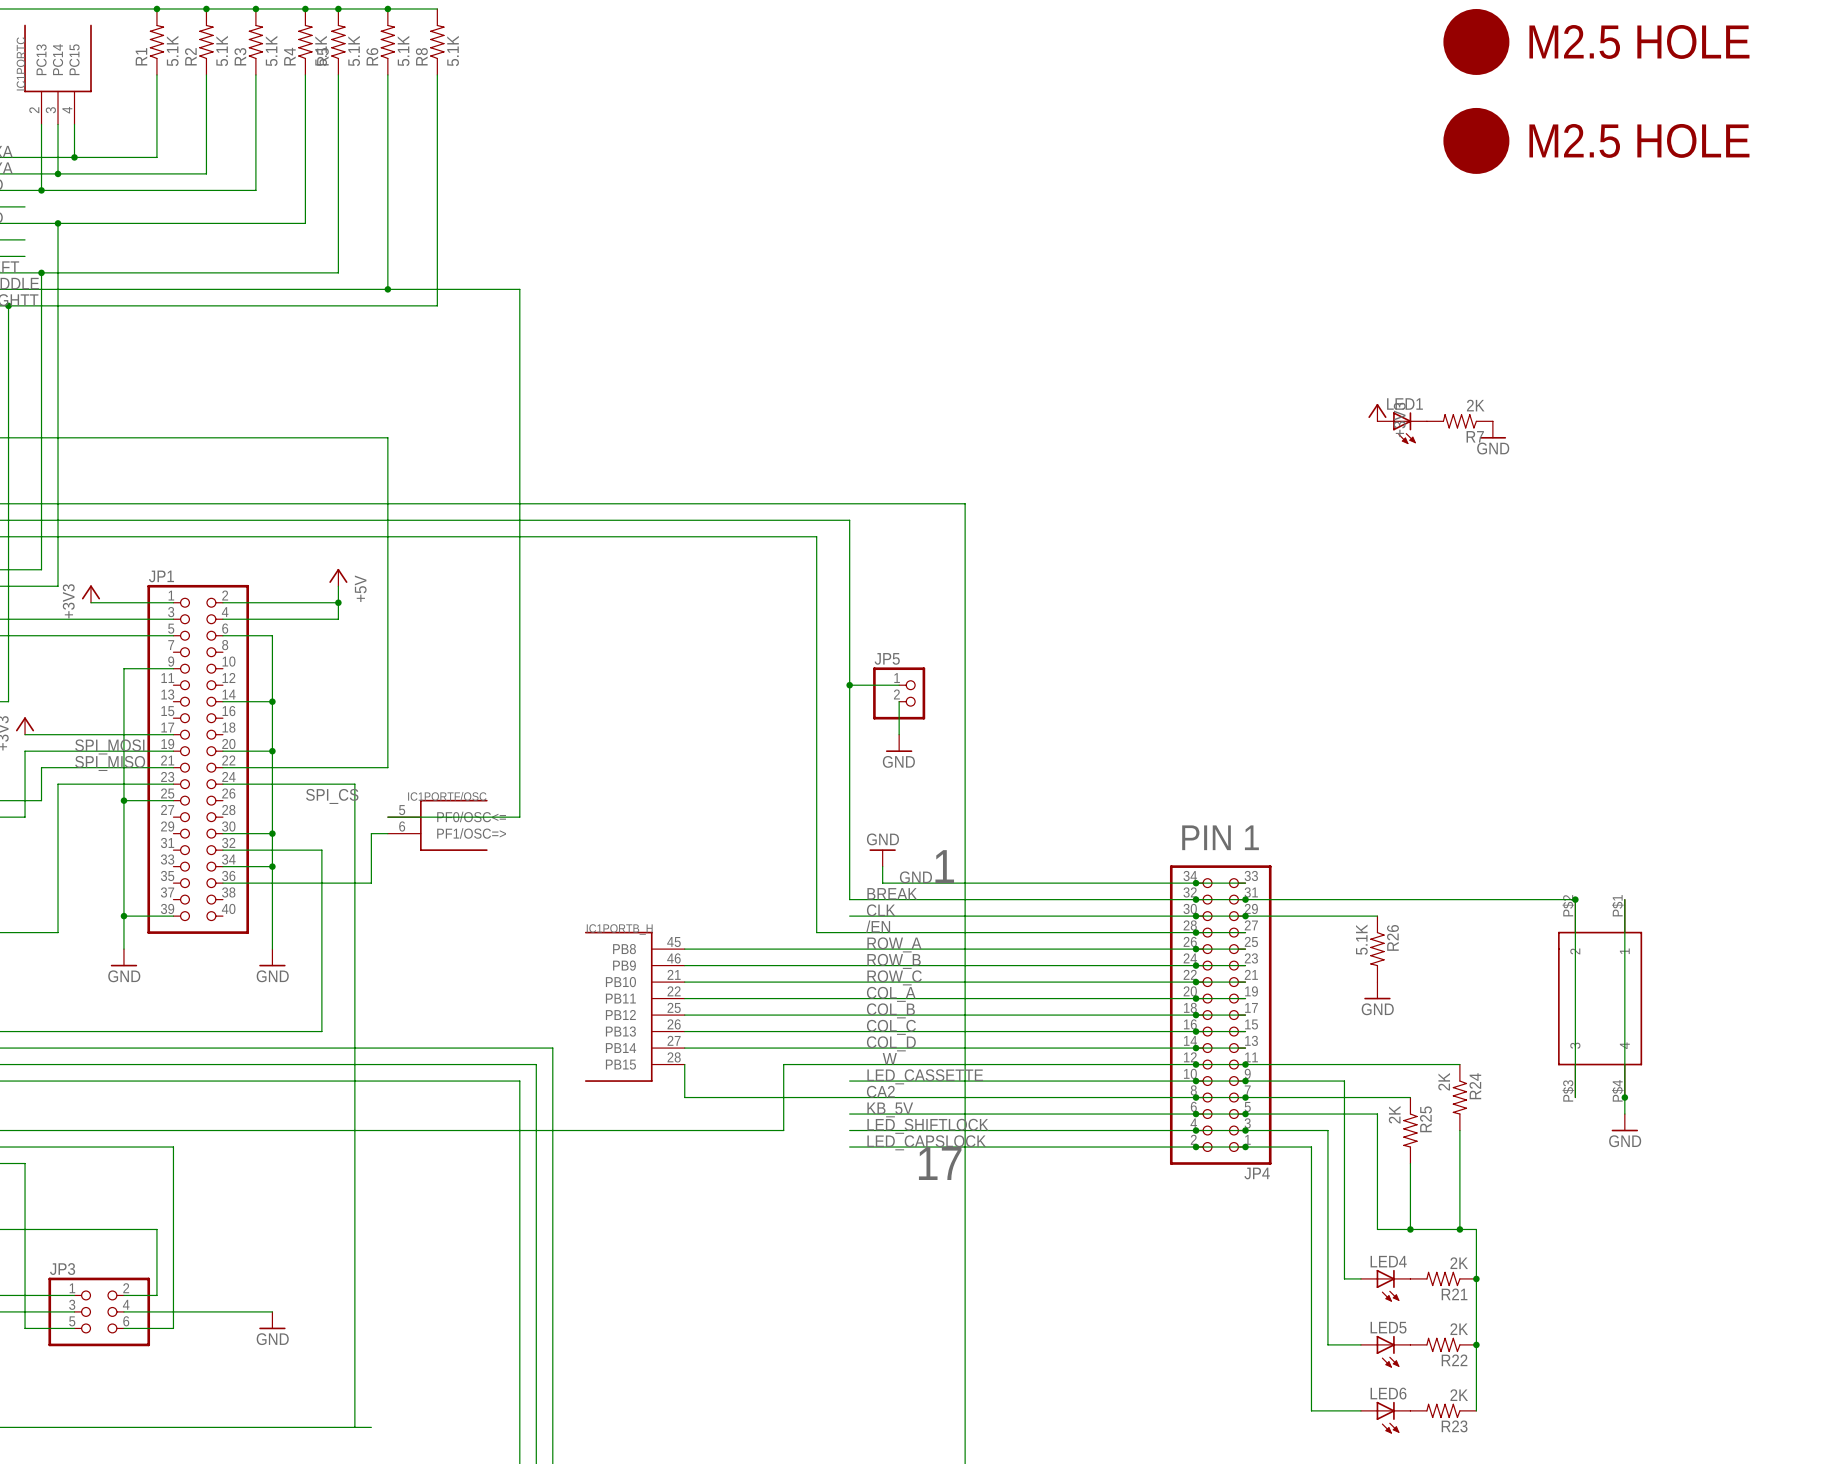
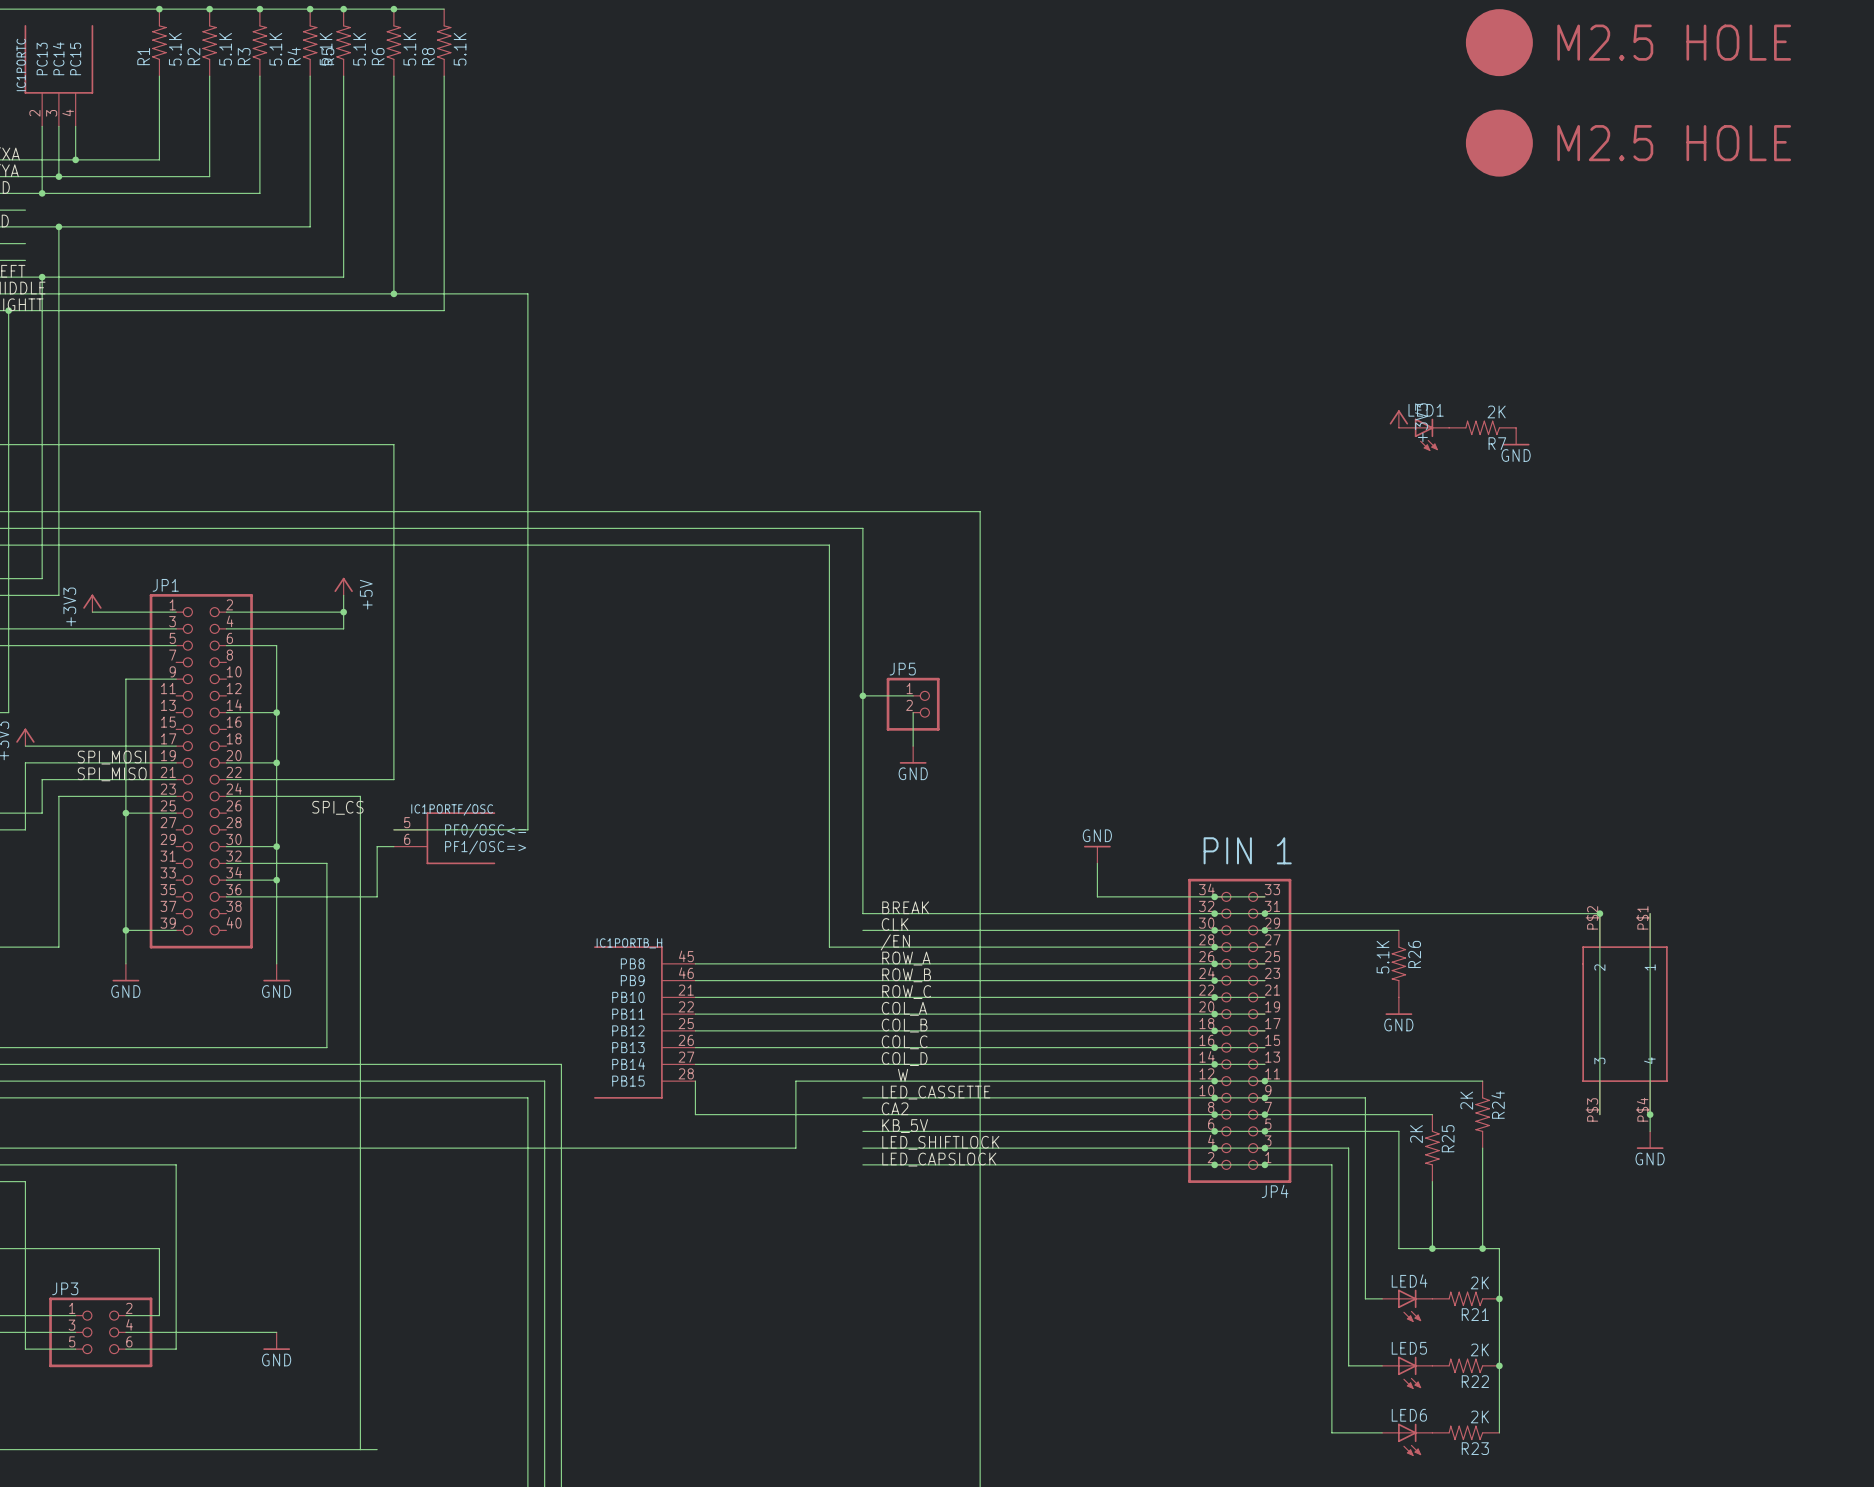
power symbol: none -> GND (1097, 854)
power symbol: GND (882, 857) -> none
wire: (882, 866) (882, 883) (1080, 883) -> (1097, 863) (1097, 896)
text: 1 (944, 866) -> none
label: GND (915, 877) -> none
text: 17 (940, 1163) -> none

